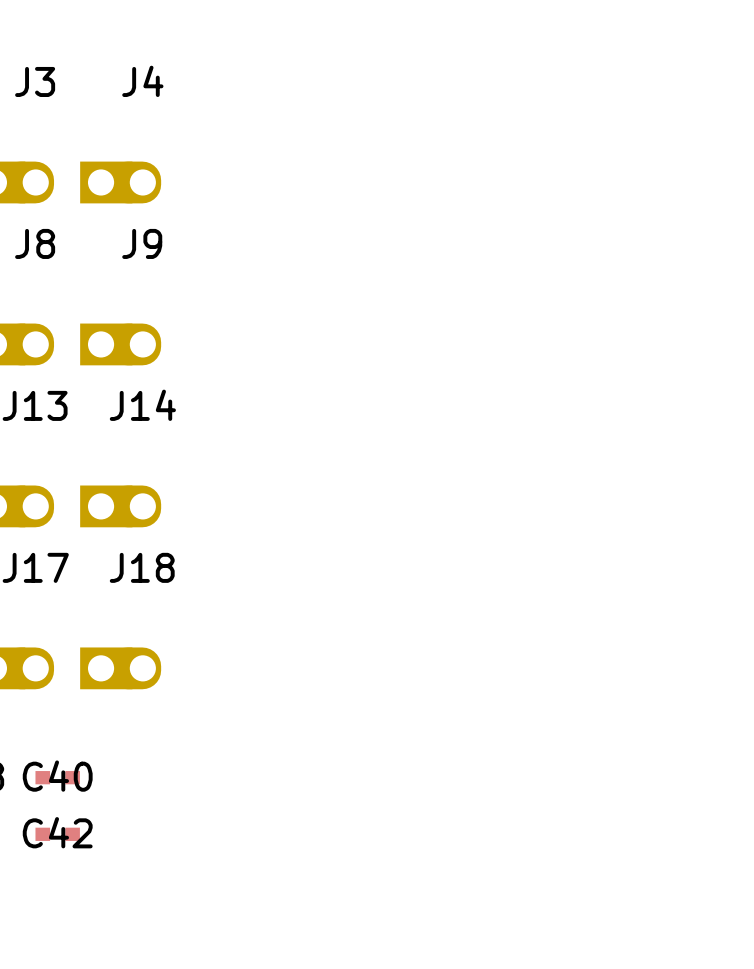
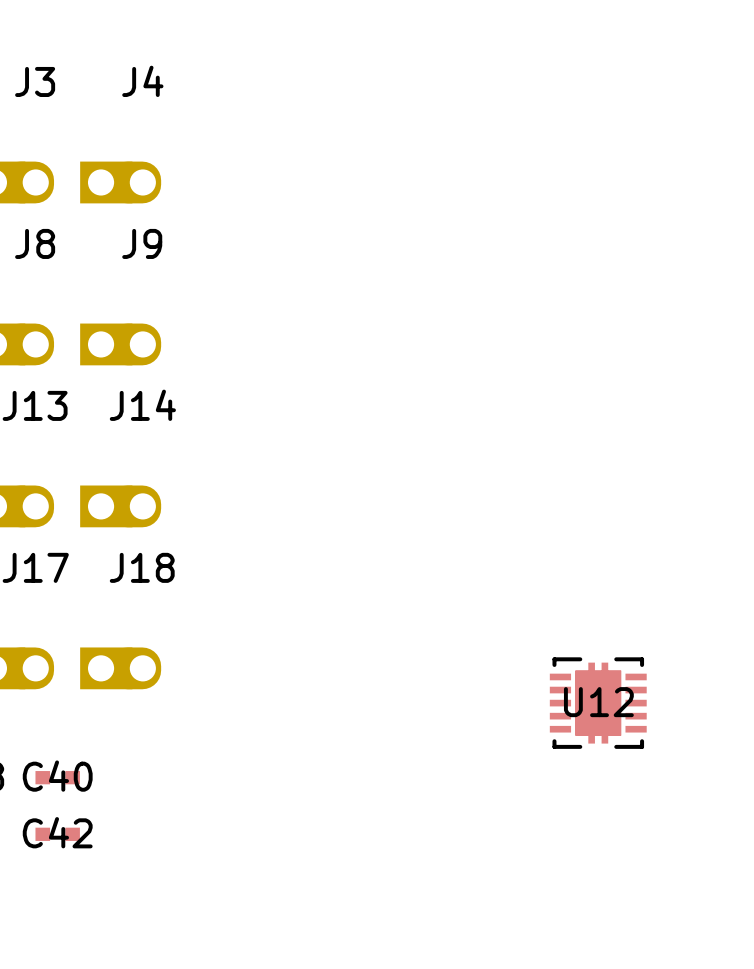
U12: none -> (598, 703)

